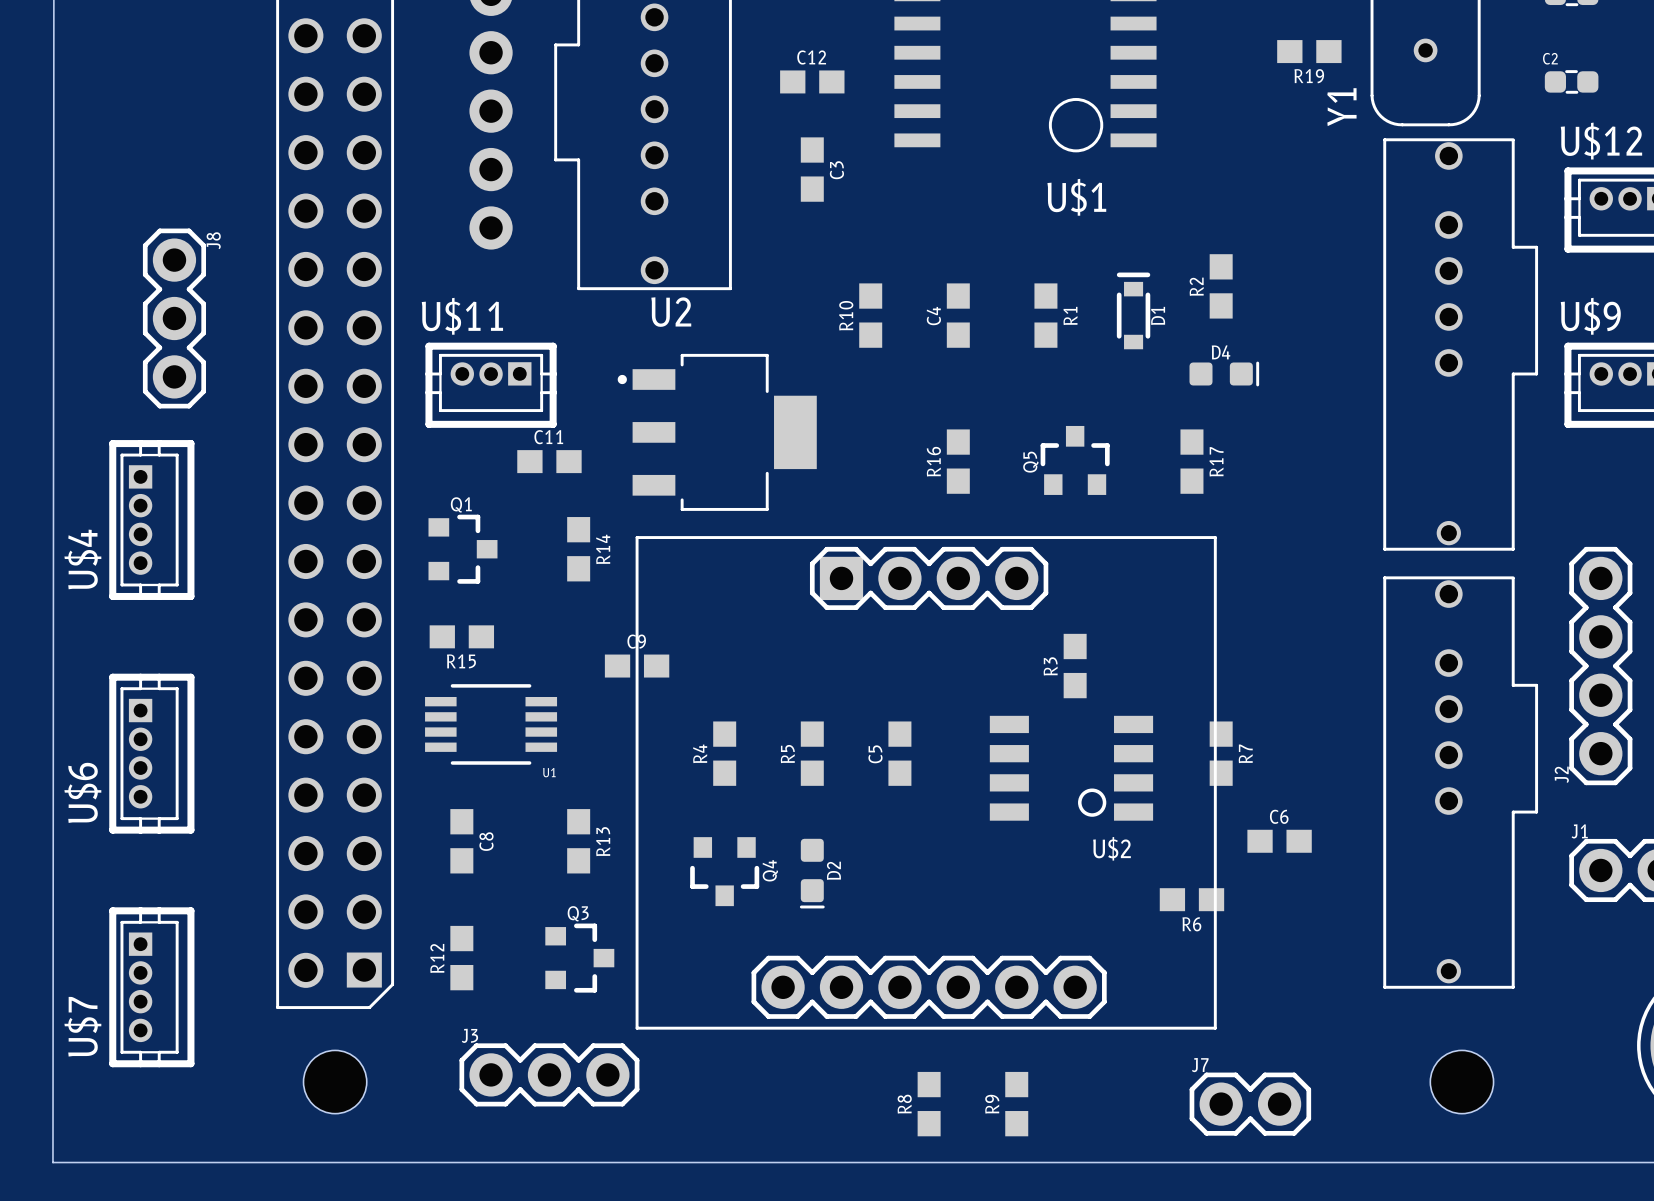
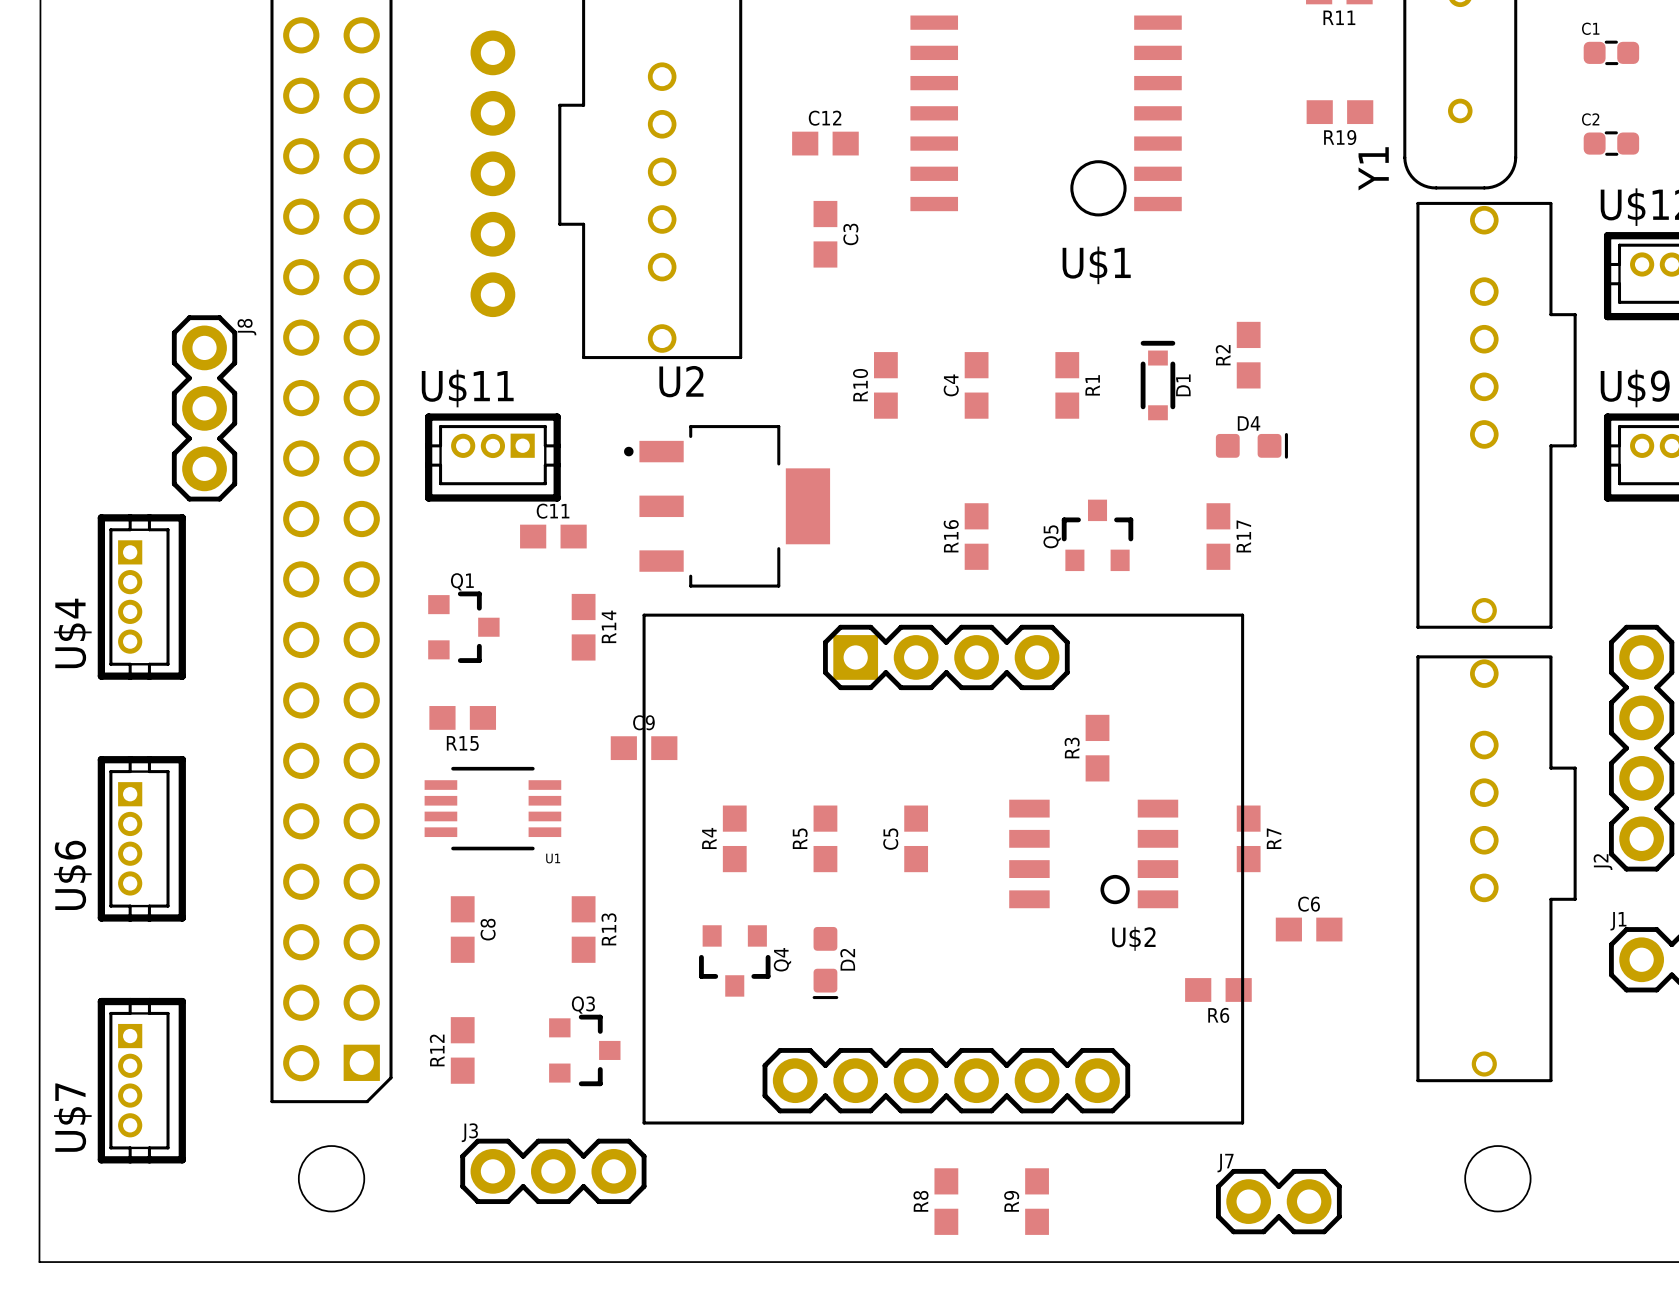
J8 position: (174, 318) -> (204, 408)

